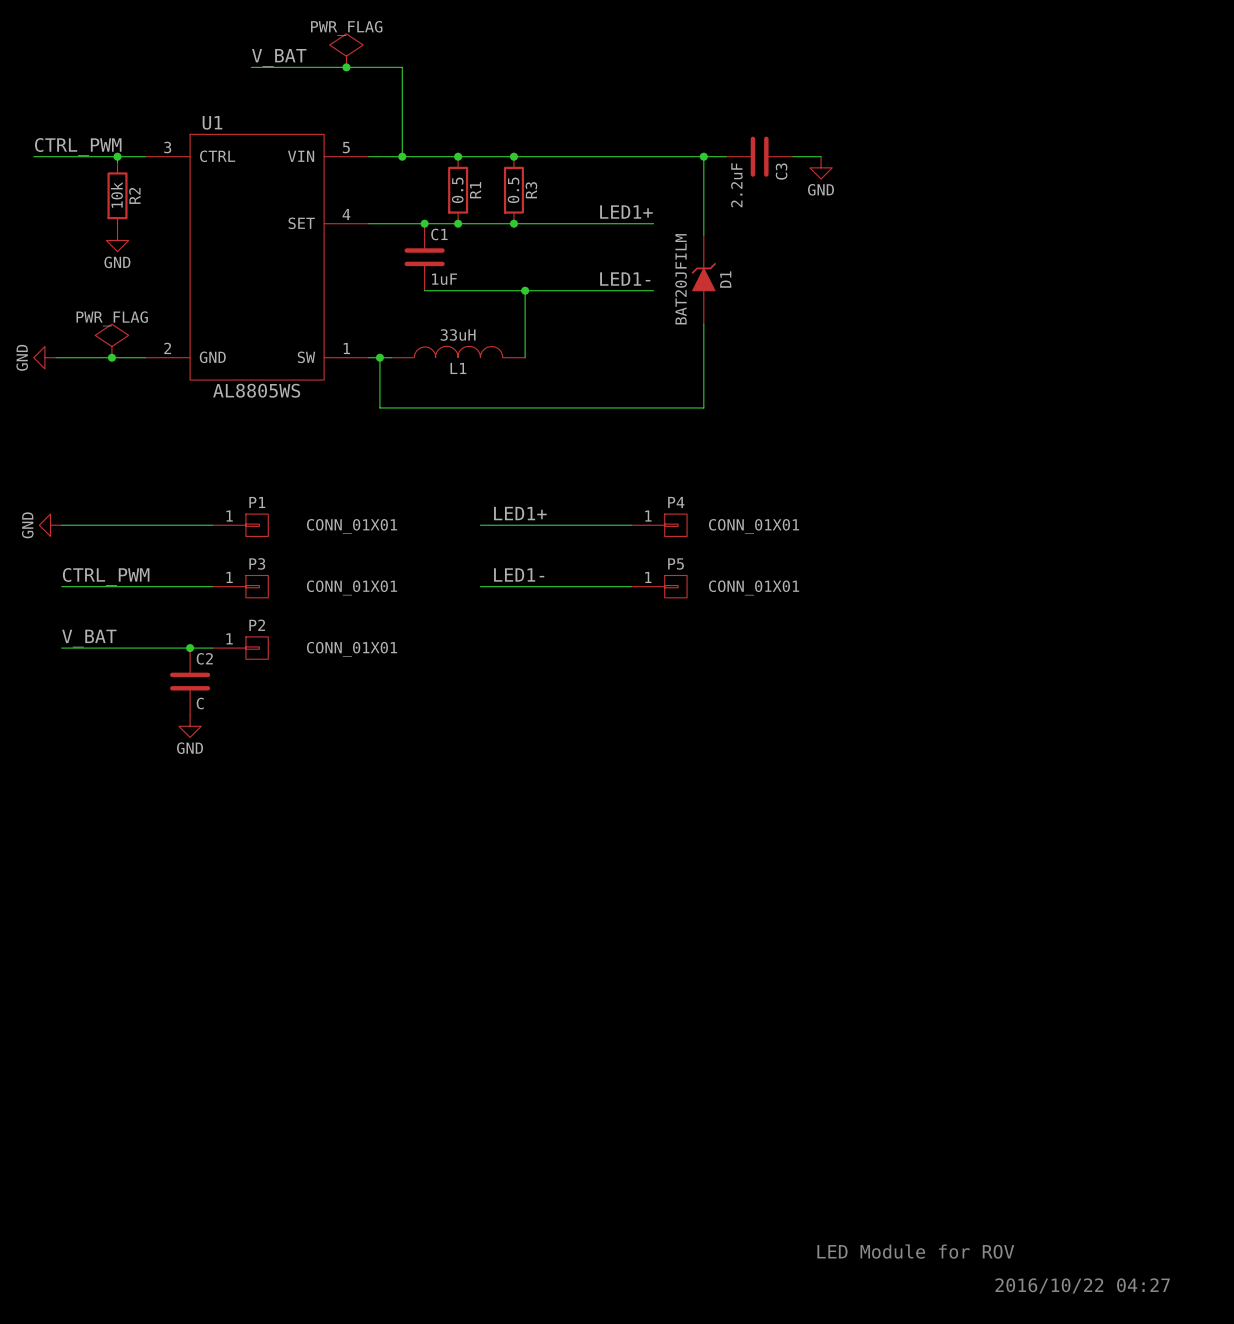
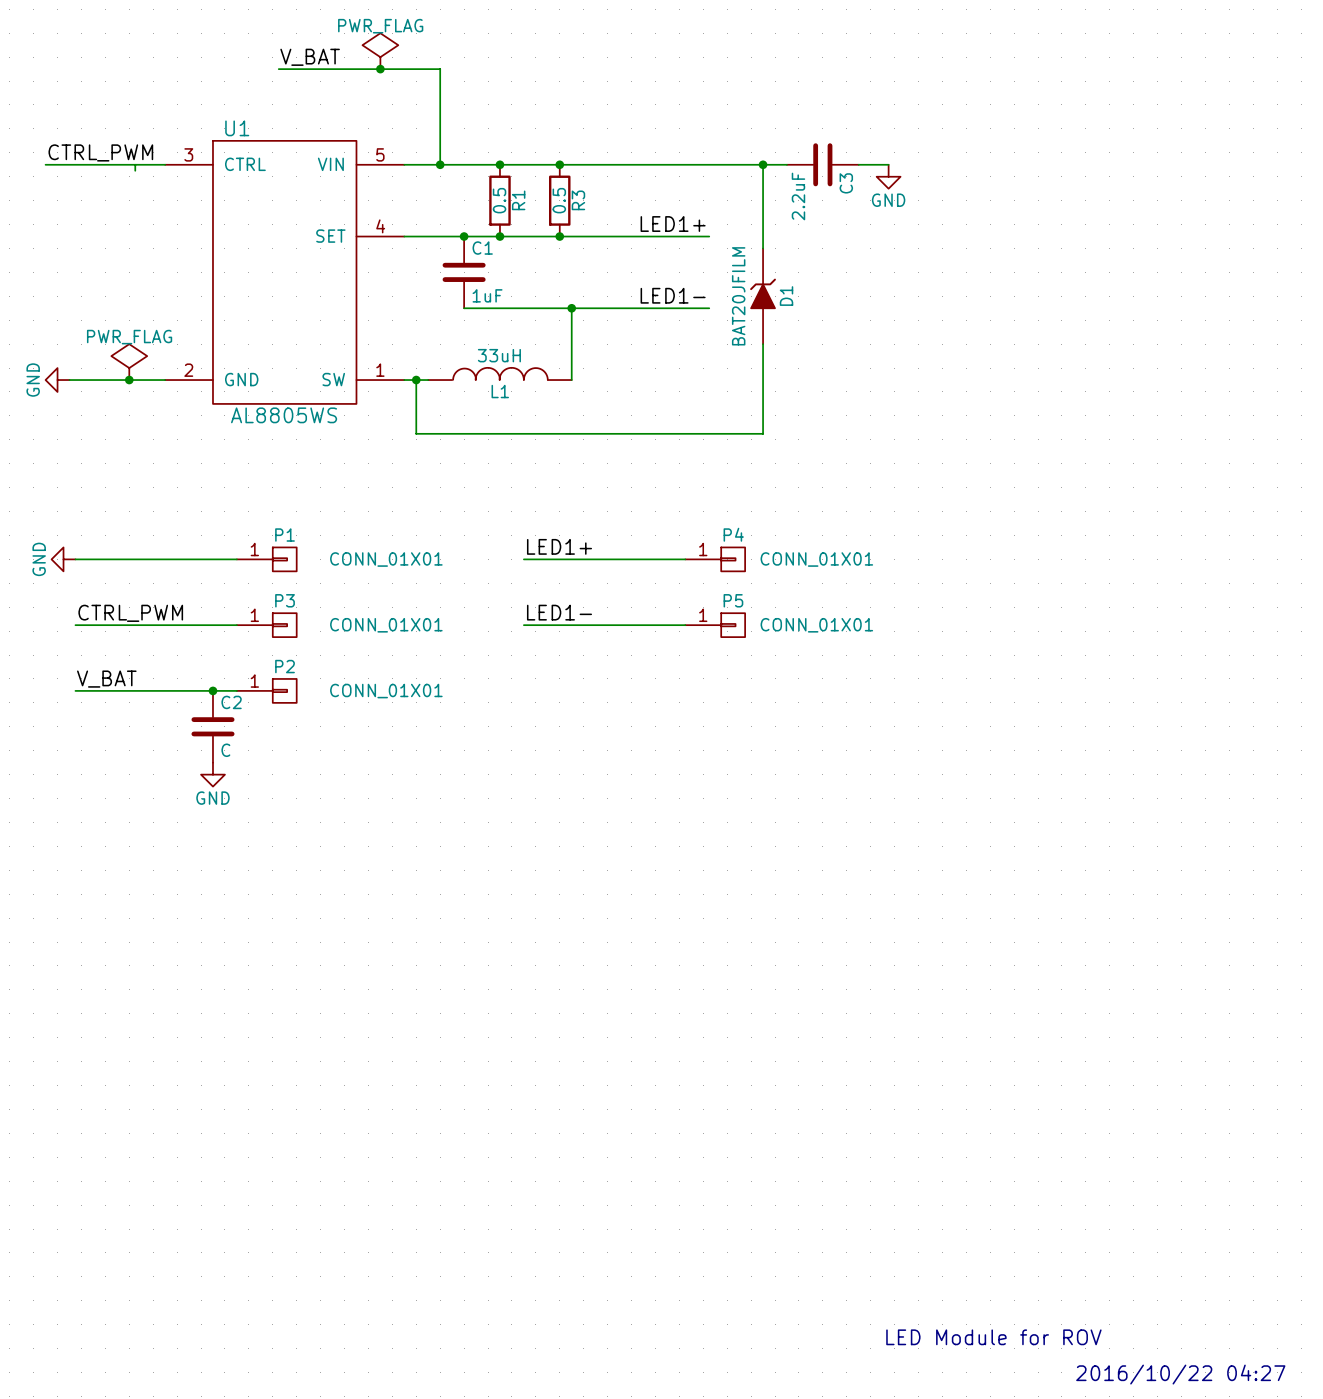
junction: (117, 156) -> none
R2: 10k (117, 195) -> none
power symbol: GND (117, 240) -> none

